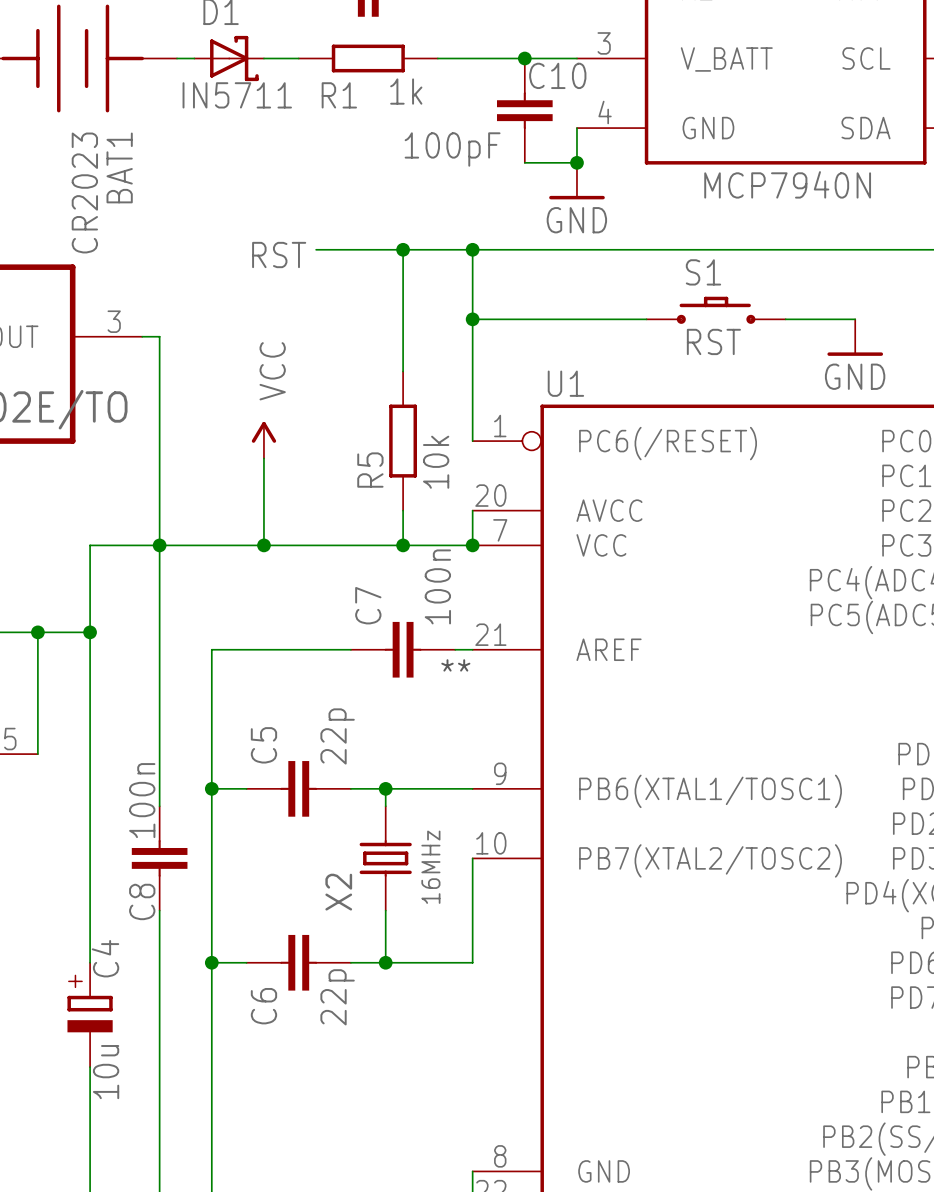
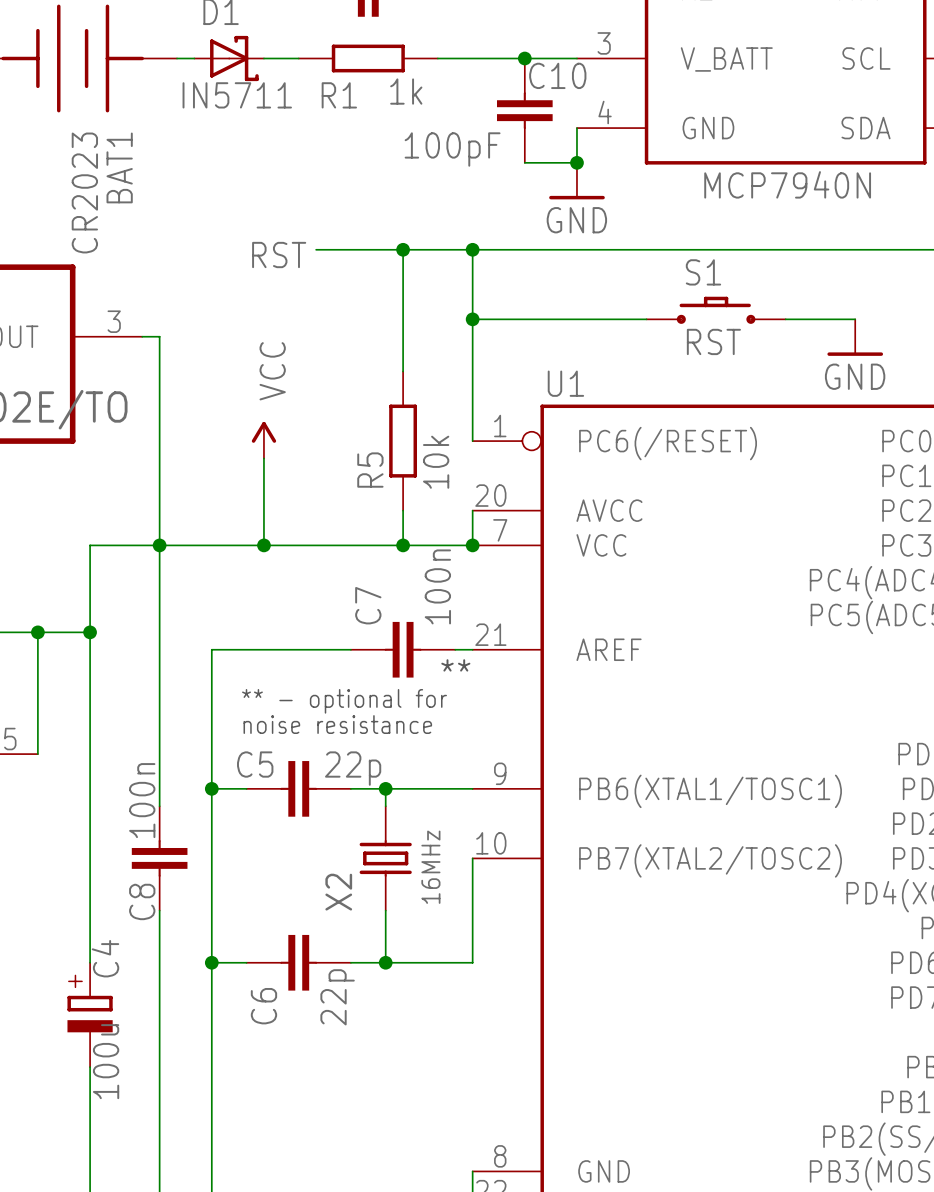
text: none -> ** - optional for (344, 701)
text: none -> noise resistance (337, 724)
C5 value rotation: 0° (337, 736) -> 90° clockwise (353, 768)
C5 name rotation: 0° (263, 745) -> 90° clockwise (255, 764)
C4 value: 10u (106, 1072) -> 100u (106, 1061)

